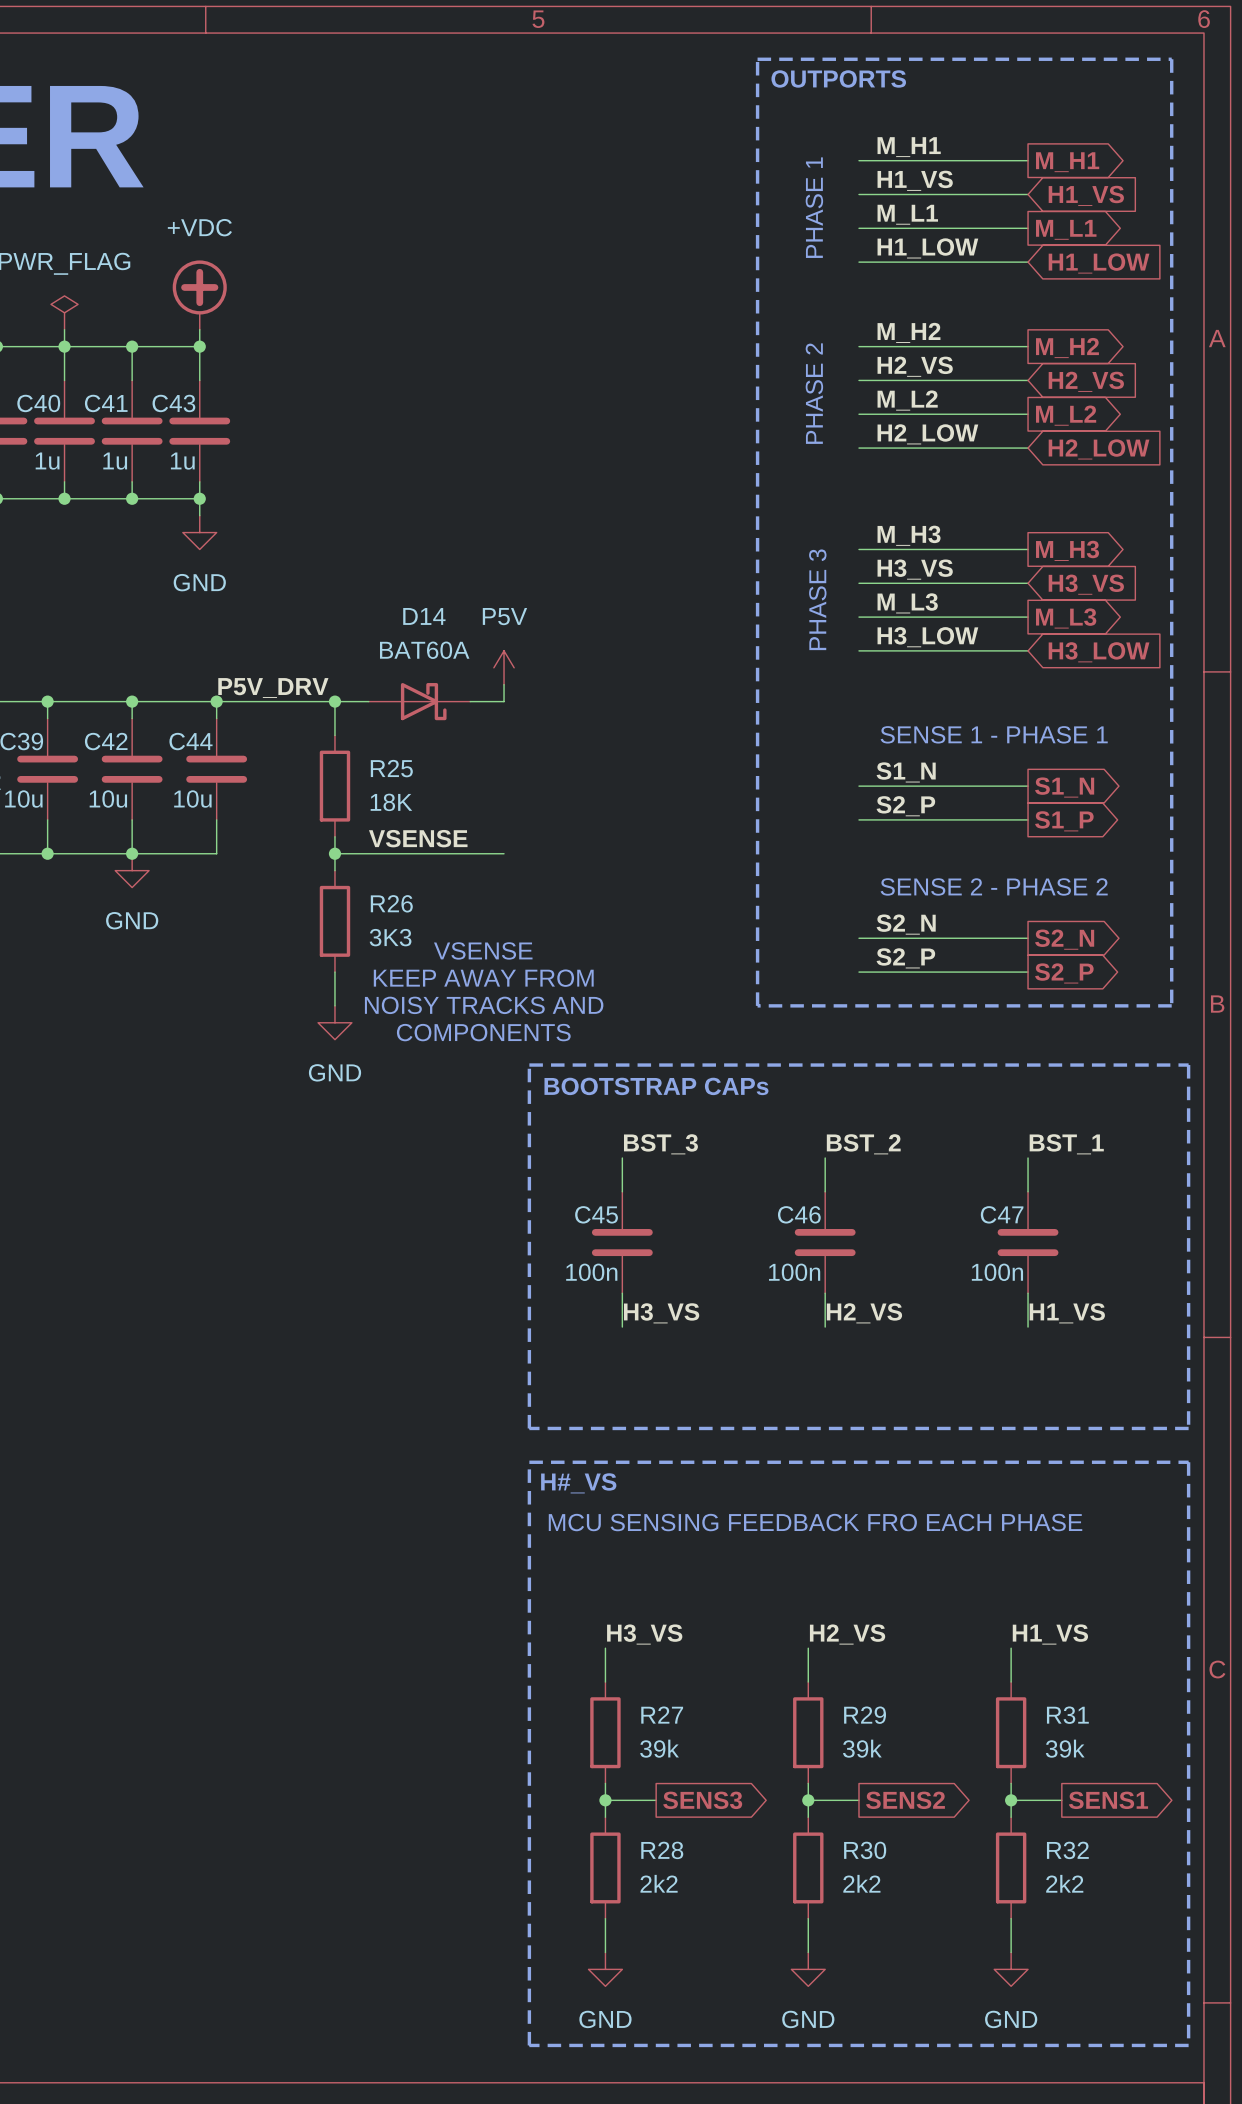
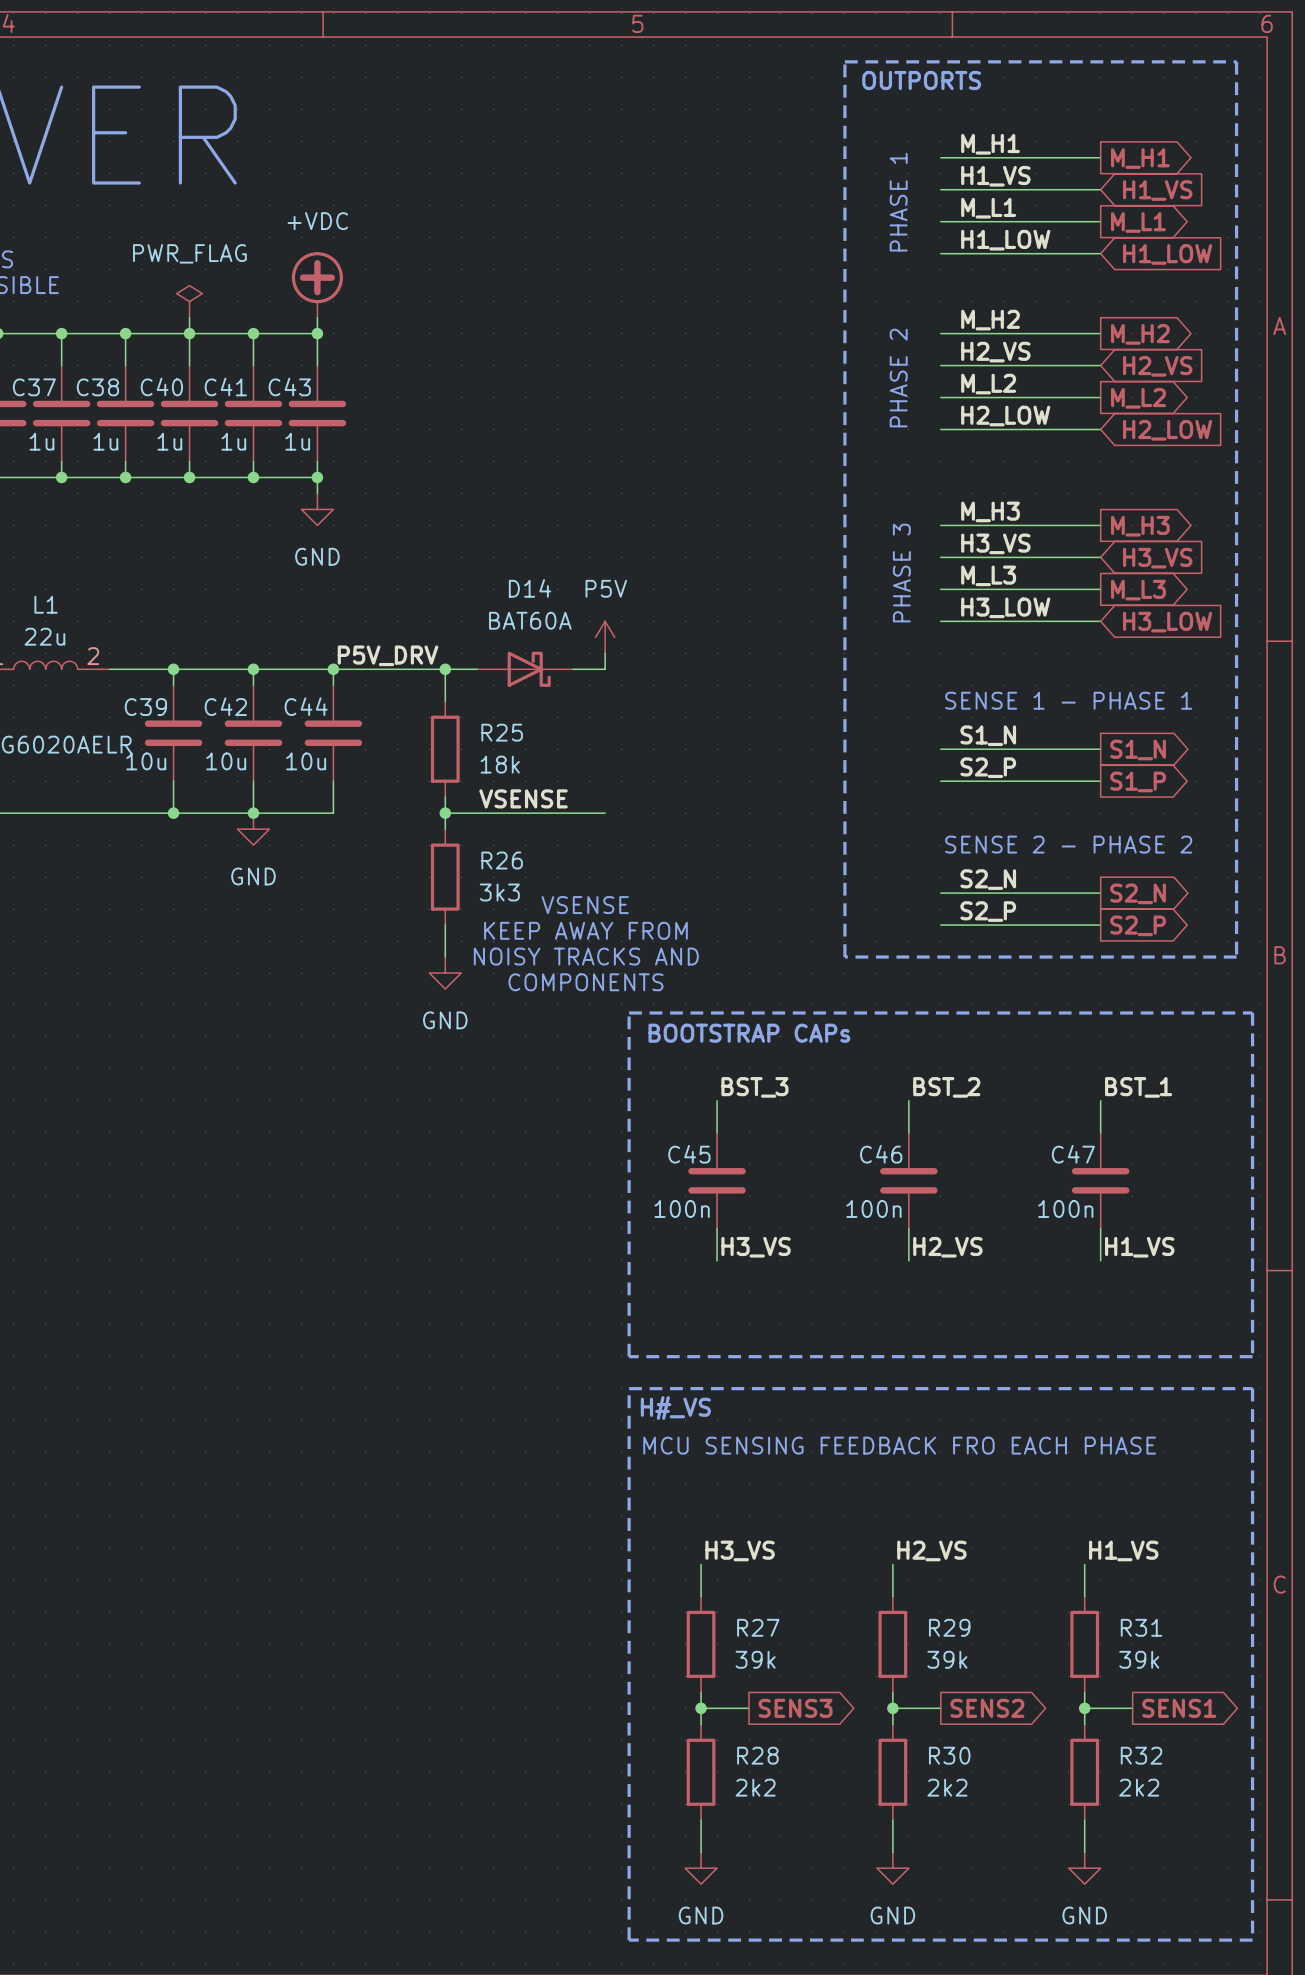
R25 value: 18K (391, 802) -> 18k (500, 764)
R26 value: 3K3 (390, 937) -> 3k3 (499, 892)

